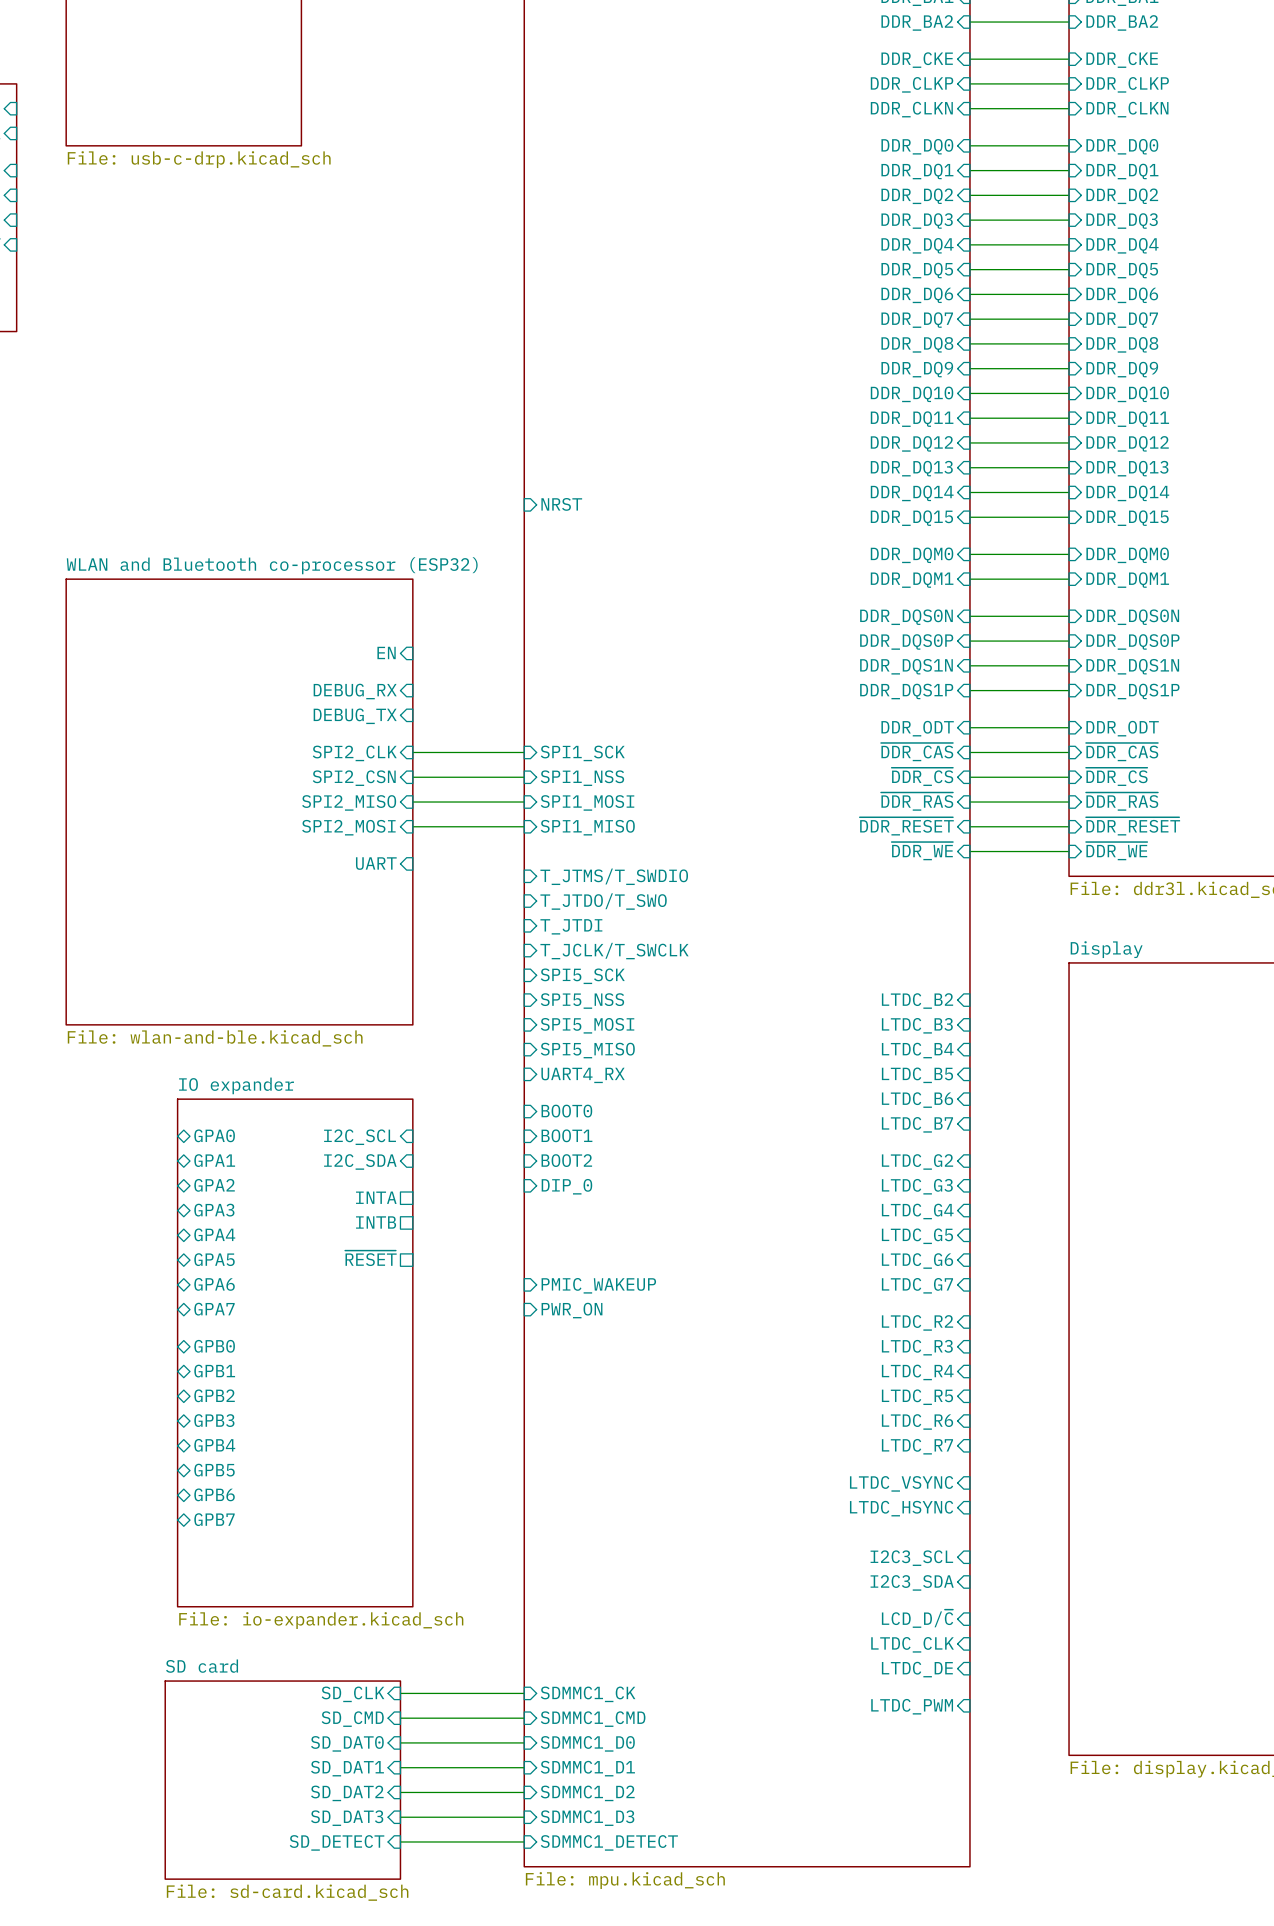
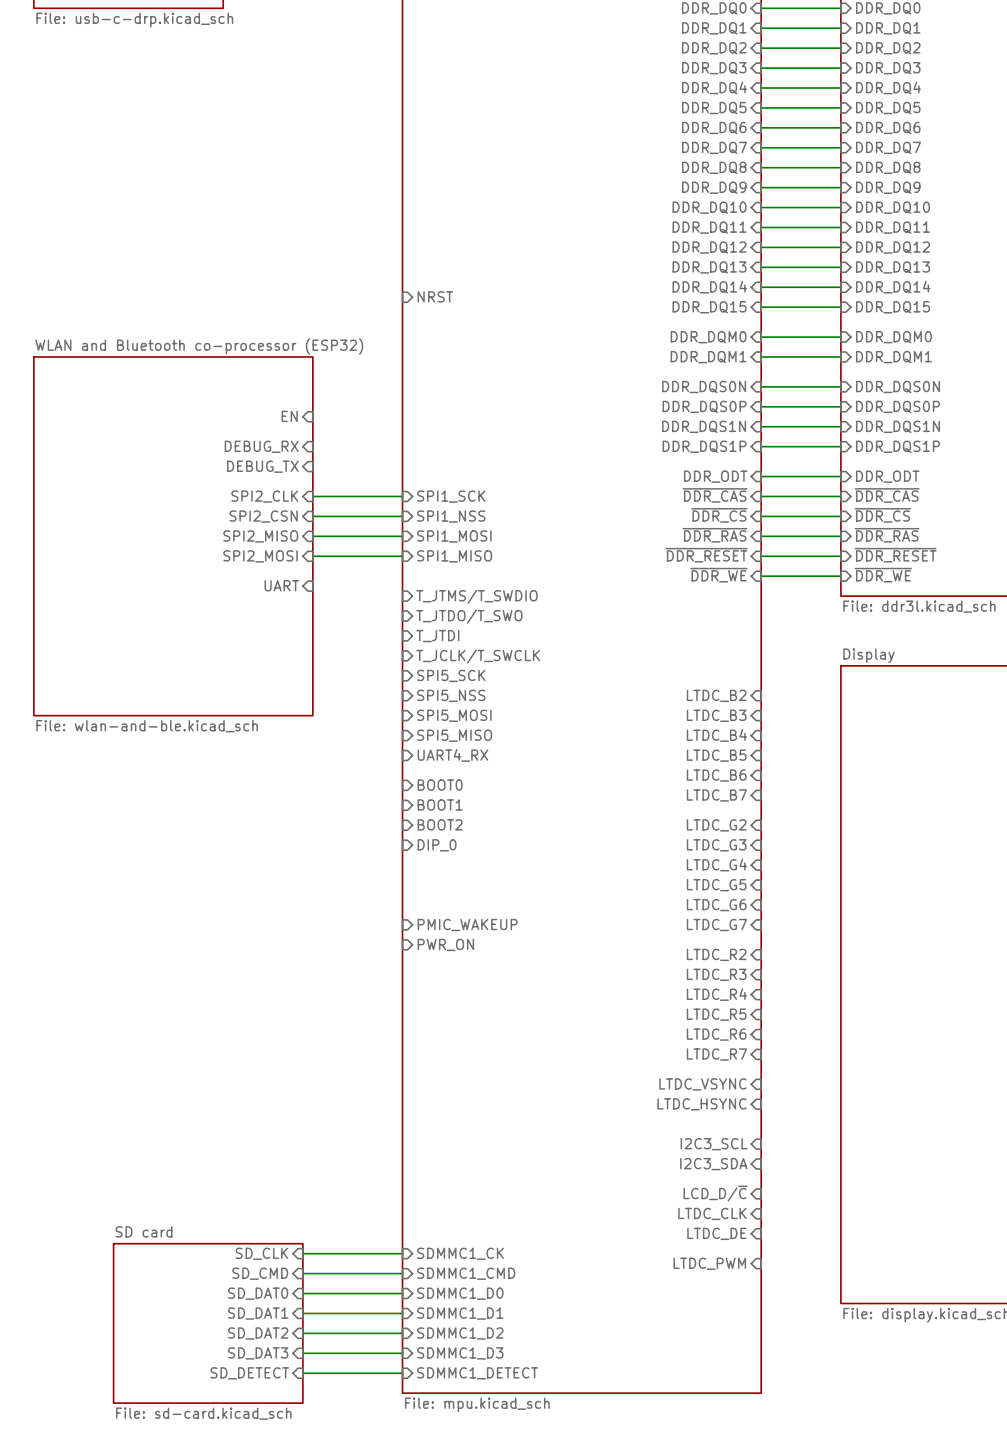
sheet pin: GPA0 (214, 1135) -> none
sheet pin: I2C_SCL (360, 1137) -> none
sheet pin: GPA1 (214, 1160) -> none
sheet pin: I2C_SDA (360, 1161) -> none
sheet pin: GPA2 (214, 1185) -> none
sheet pin: INTA (376, 1197) -> none
sheet pin: GPA3 (214, 1210) -> none
sheet pin: INTB (376, 1222) -> none
sheet pin: GPA4 (214, 1234) -> none
sheet pin: ~{RESET} (370, 1258) -> none
sheet pin: GPA5 (214, 1259) -> none
sheet pin: GPA6 (214, 1284) -> none
sheet pin: GPA7 (214, 1309) -> none
sheet pin: GPB0 (214, 1346) -> none
sheet IO expander: File: io-expander.kicad_sch (295, 1352) -> none
sheet pin: GPB1 (214, 1371) -> none
sheet pin: GPB2 (214, 1395) -> none
sheet pin: GPB3 (214, 1420) -> none
sheet pin: GPB4 (214, 1445) -> none
sheet pin: GPB5 (214, 1470) -> none
sheet pin: GPB6 (214, 1494) -> none
sheet pin: GPB7 (214, 1519) -> none

